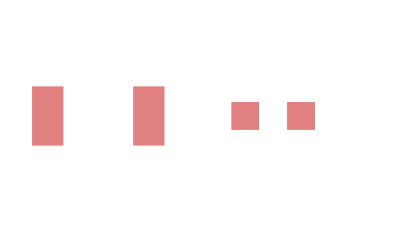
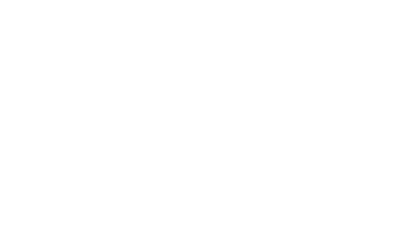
part: (98, 115) -> none
part: (273, 115) -> none

